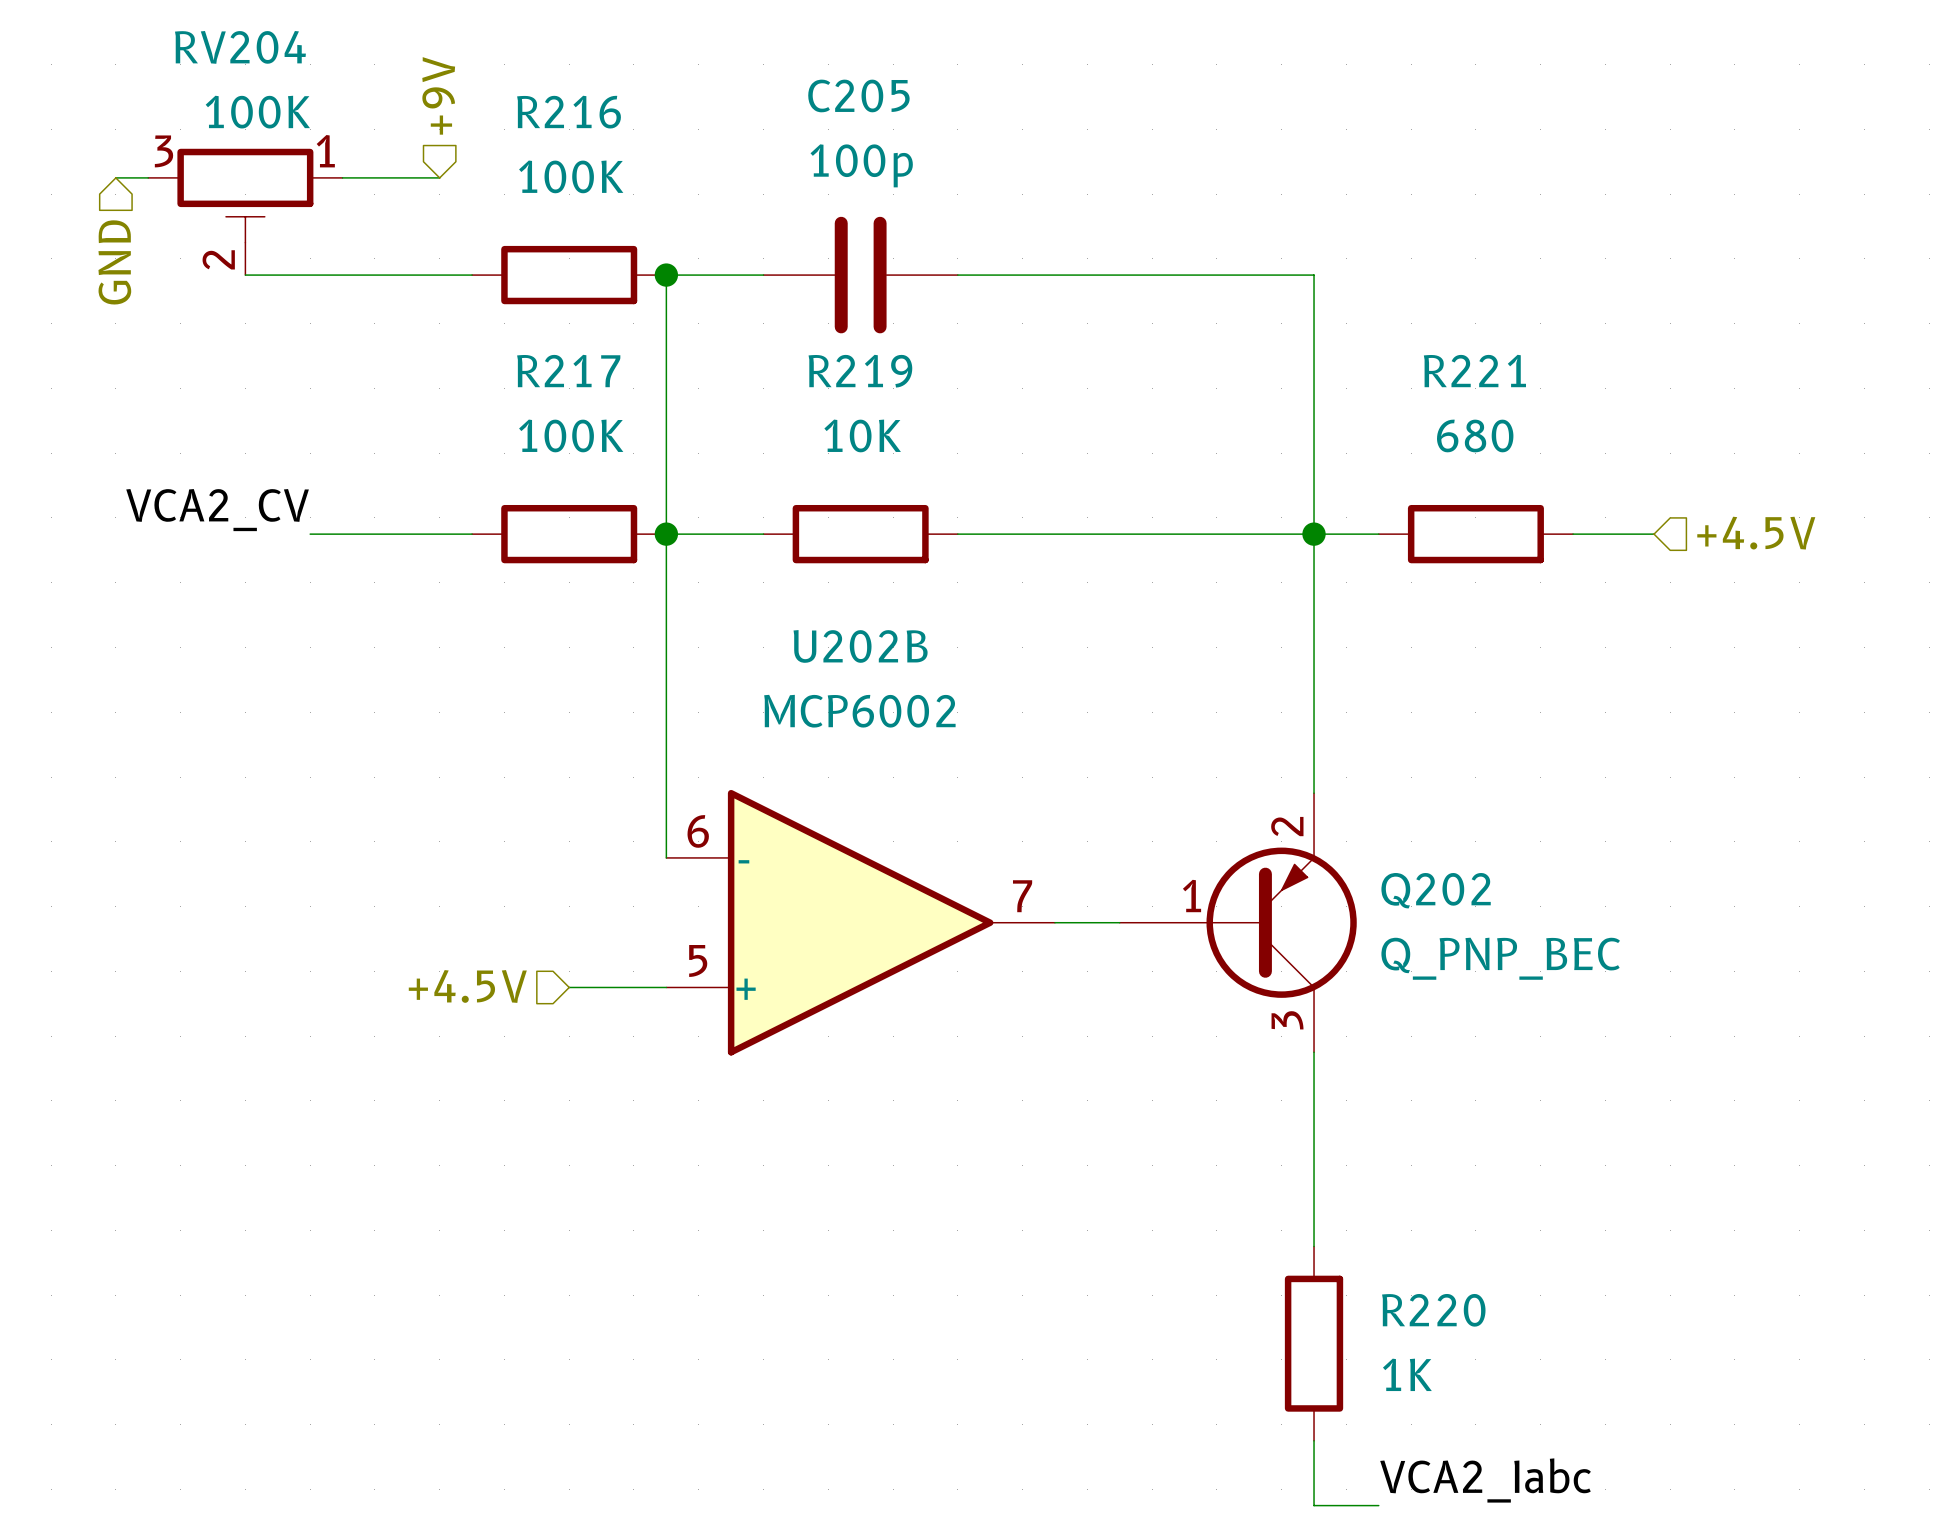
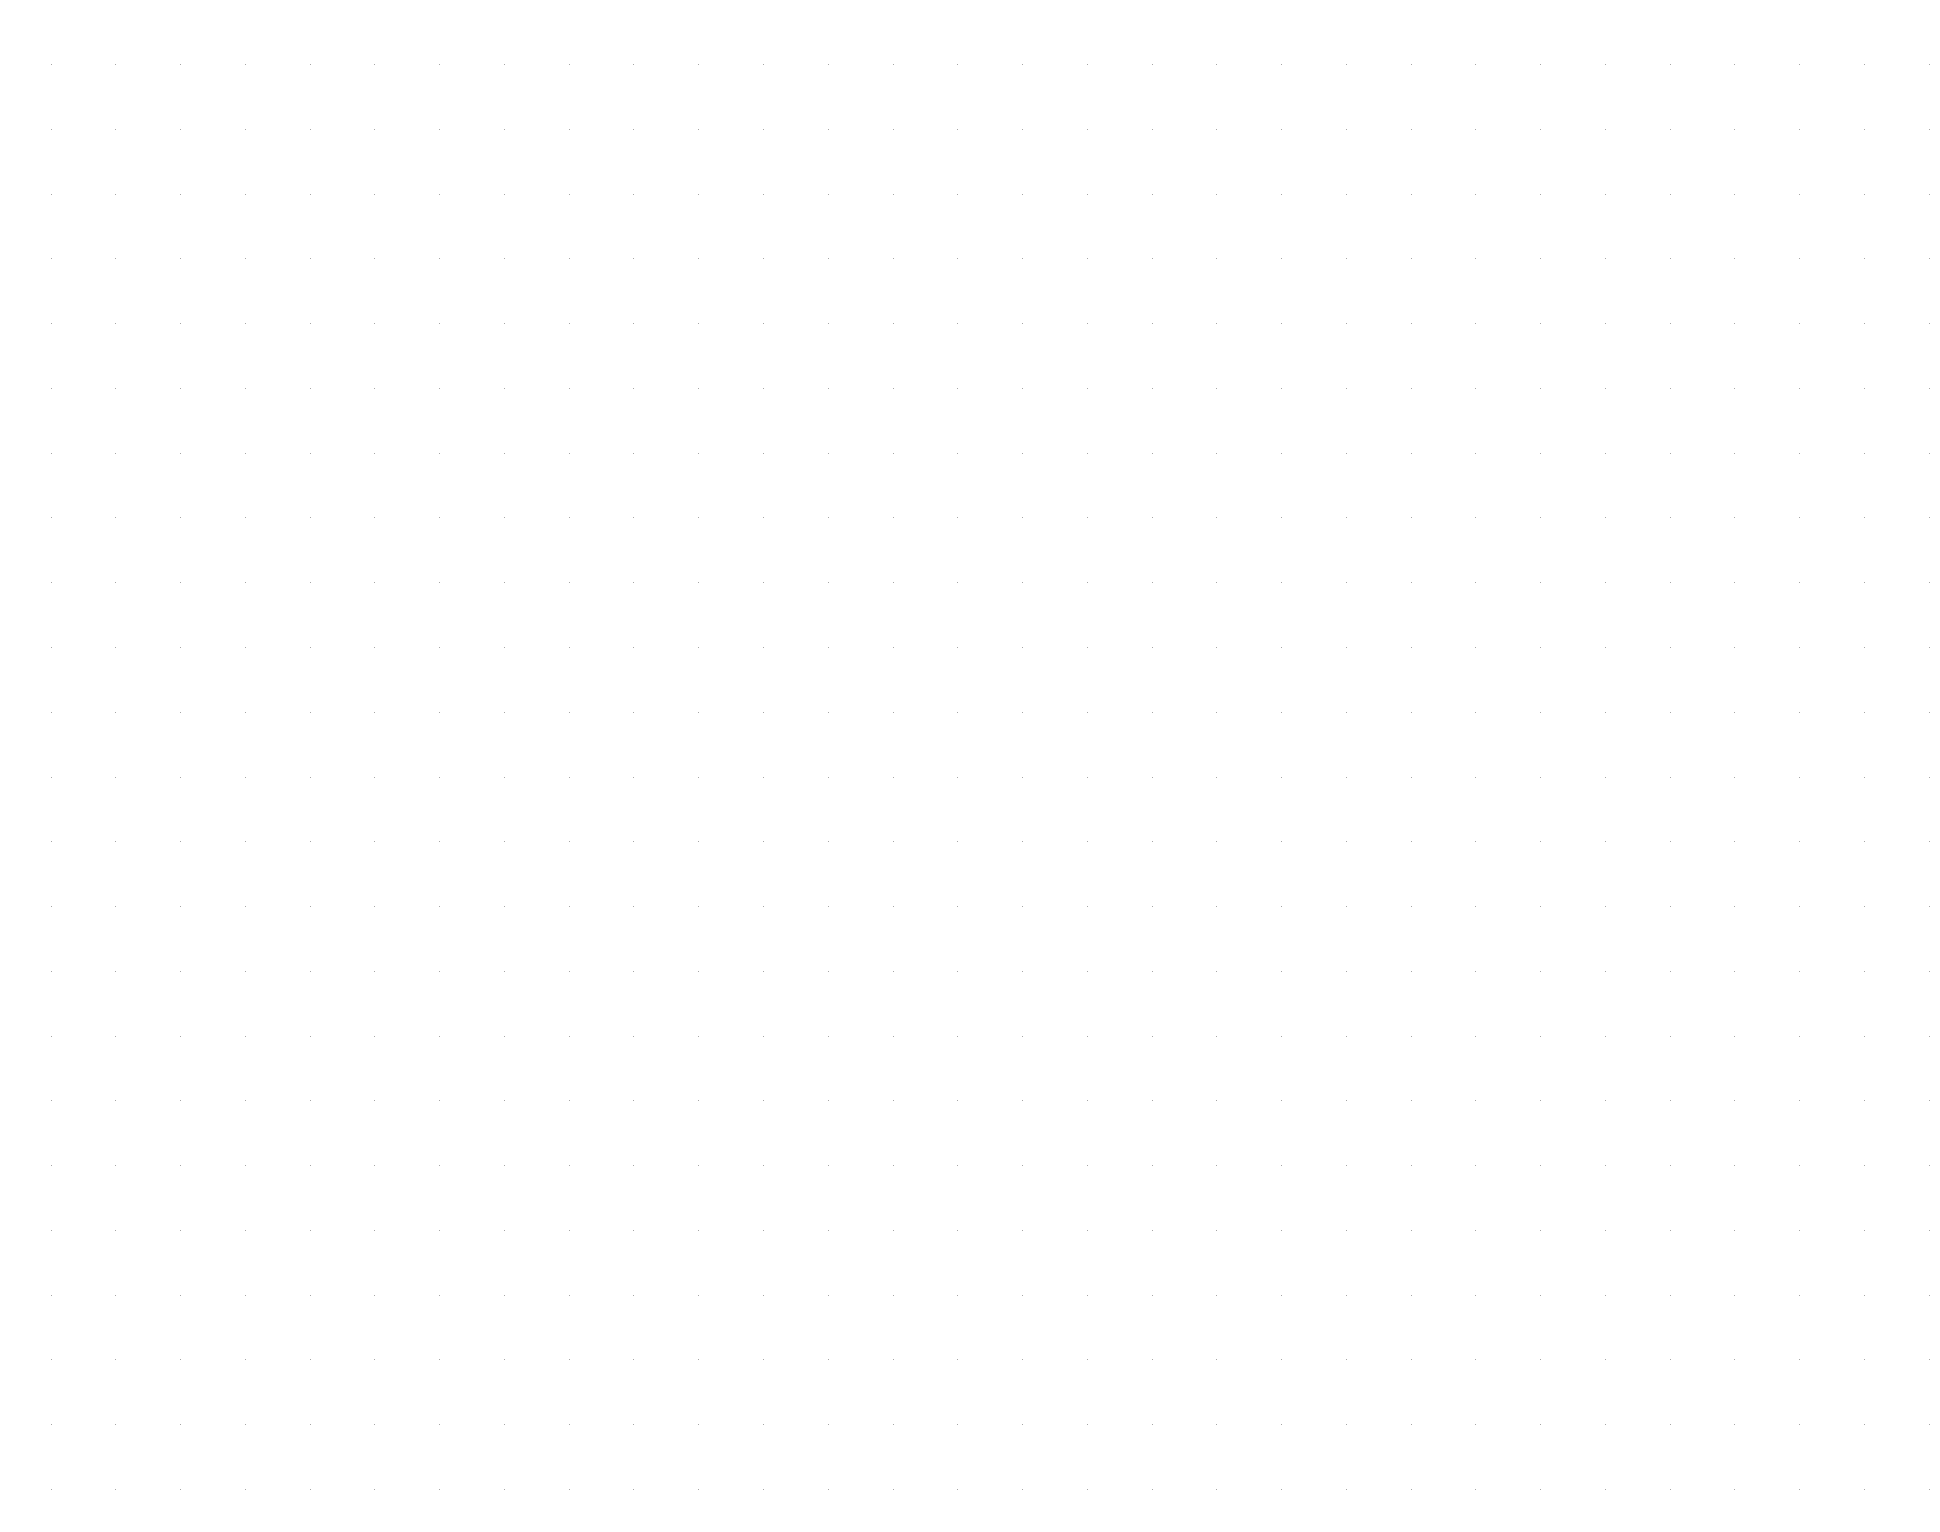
hierarchical label: +9V (438, 95) -> none
wire: (115, 177) (148, 177) -> none
wire: (342, 177) (439, 177) -> none
RV204: 100K (245, 211) -> none
hierarchical label: GND (114, 262) -> none
wire: (245, 275) (472, 275) -> none
R216: 100K (569, 275) -> none
junction: (666, 275) -> none
wire: (763, 275) (666, 275) (666, 857) -> none
C205: 100p (860, 275) -> none
wire: (957, 275) (1314, 275) (1314, 793) -> none
label: VCA2_CV (217, 510) -> none
hierarchical label: +4.5V (1756, 533) -> none
wire: (310, 534) (472, 534) -> none
R217: 100K (569, 534) -> none
wire: (666, 534) (763, 534) -> none
junction: (666, 534) -> none
R219: 10K (860, 534) -> none
wire: (957, 534) (1378, 534) -> none
junction: (1314, 534) -> none
R221: 680 (1475, 534) -> none
wire: (1573, 534) (1654, 534) -> none
U202B: MCP6002 (860, 922) -> none
wire: (1054, 922) (1119, 922) -> none
Q202: Q_PNP_BEC (1238, 922) -> none
hierarchical label: +4.5V (467, 986) -> none
wire: (569, 987) (666, 987) -> none
wire: (1314, 1052) (1314, 1246) -> none
R220: 1K (1314, 1343) -> none
wire: (1314, 1440) (1314, 1505) (1378, 1505) -> none
label: VCA2_Iabc (1485, 1480) -> none

